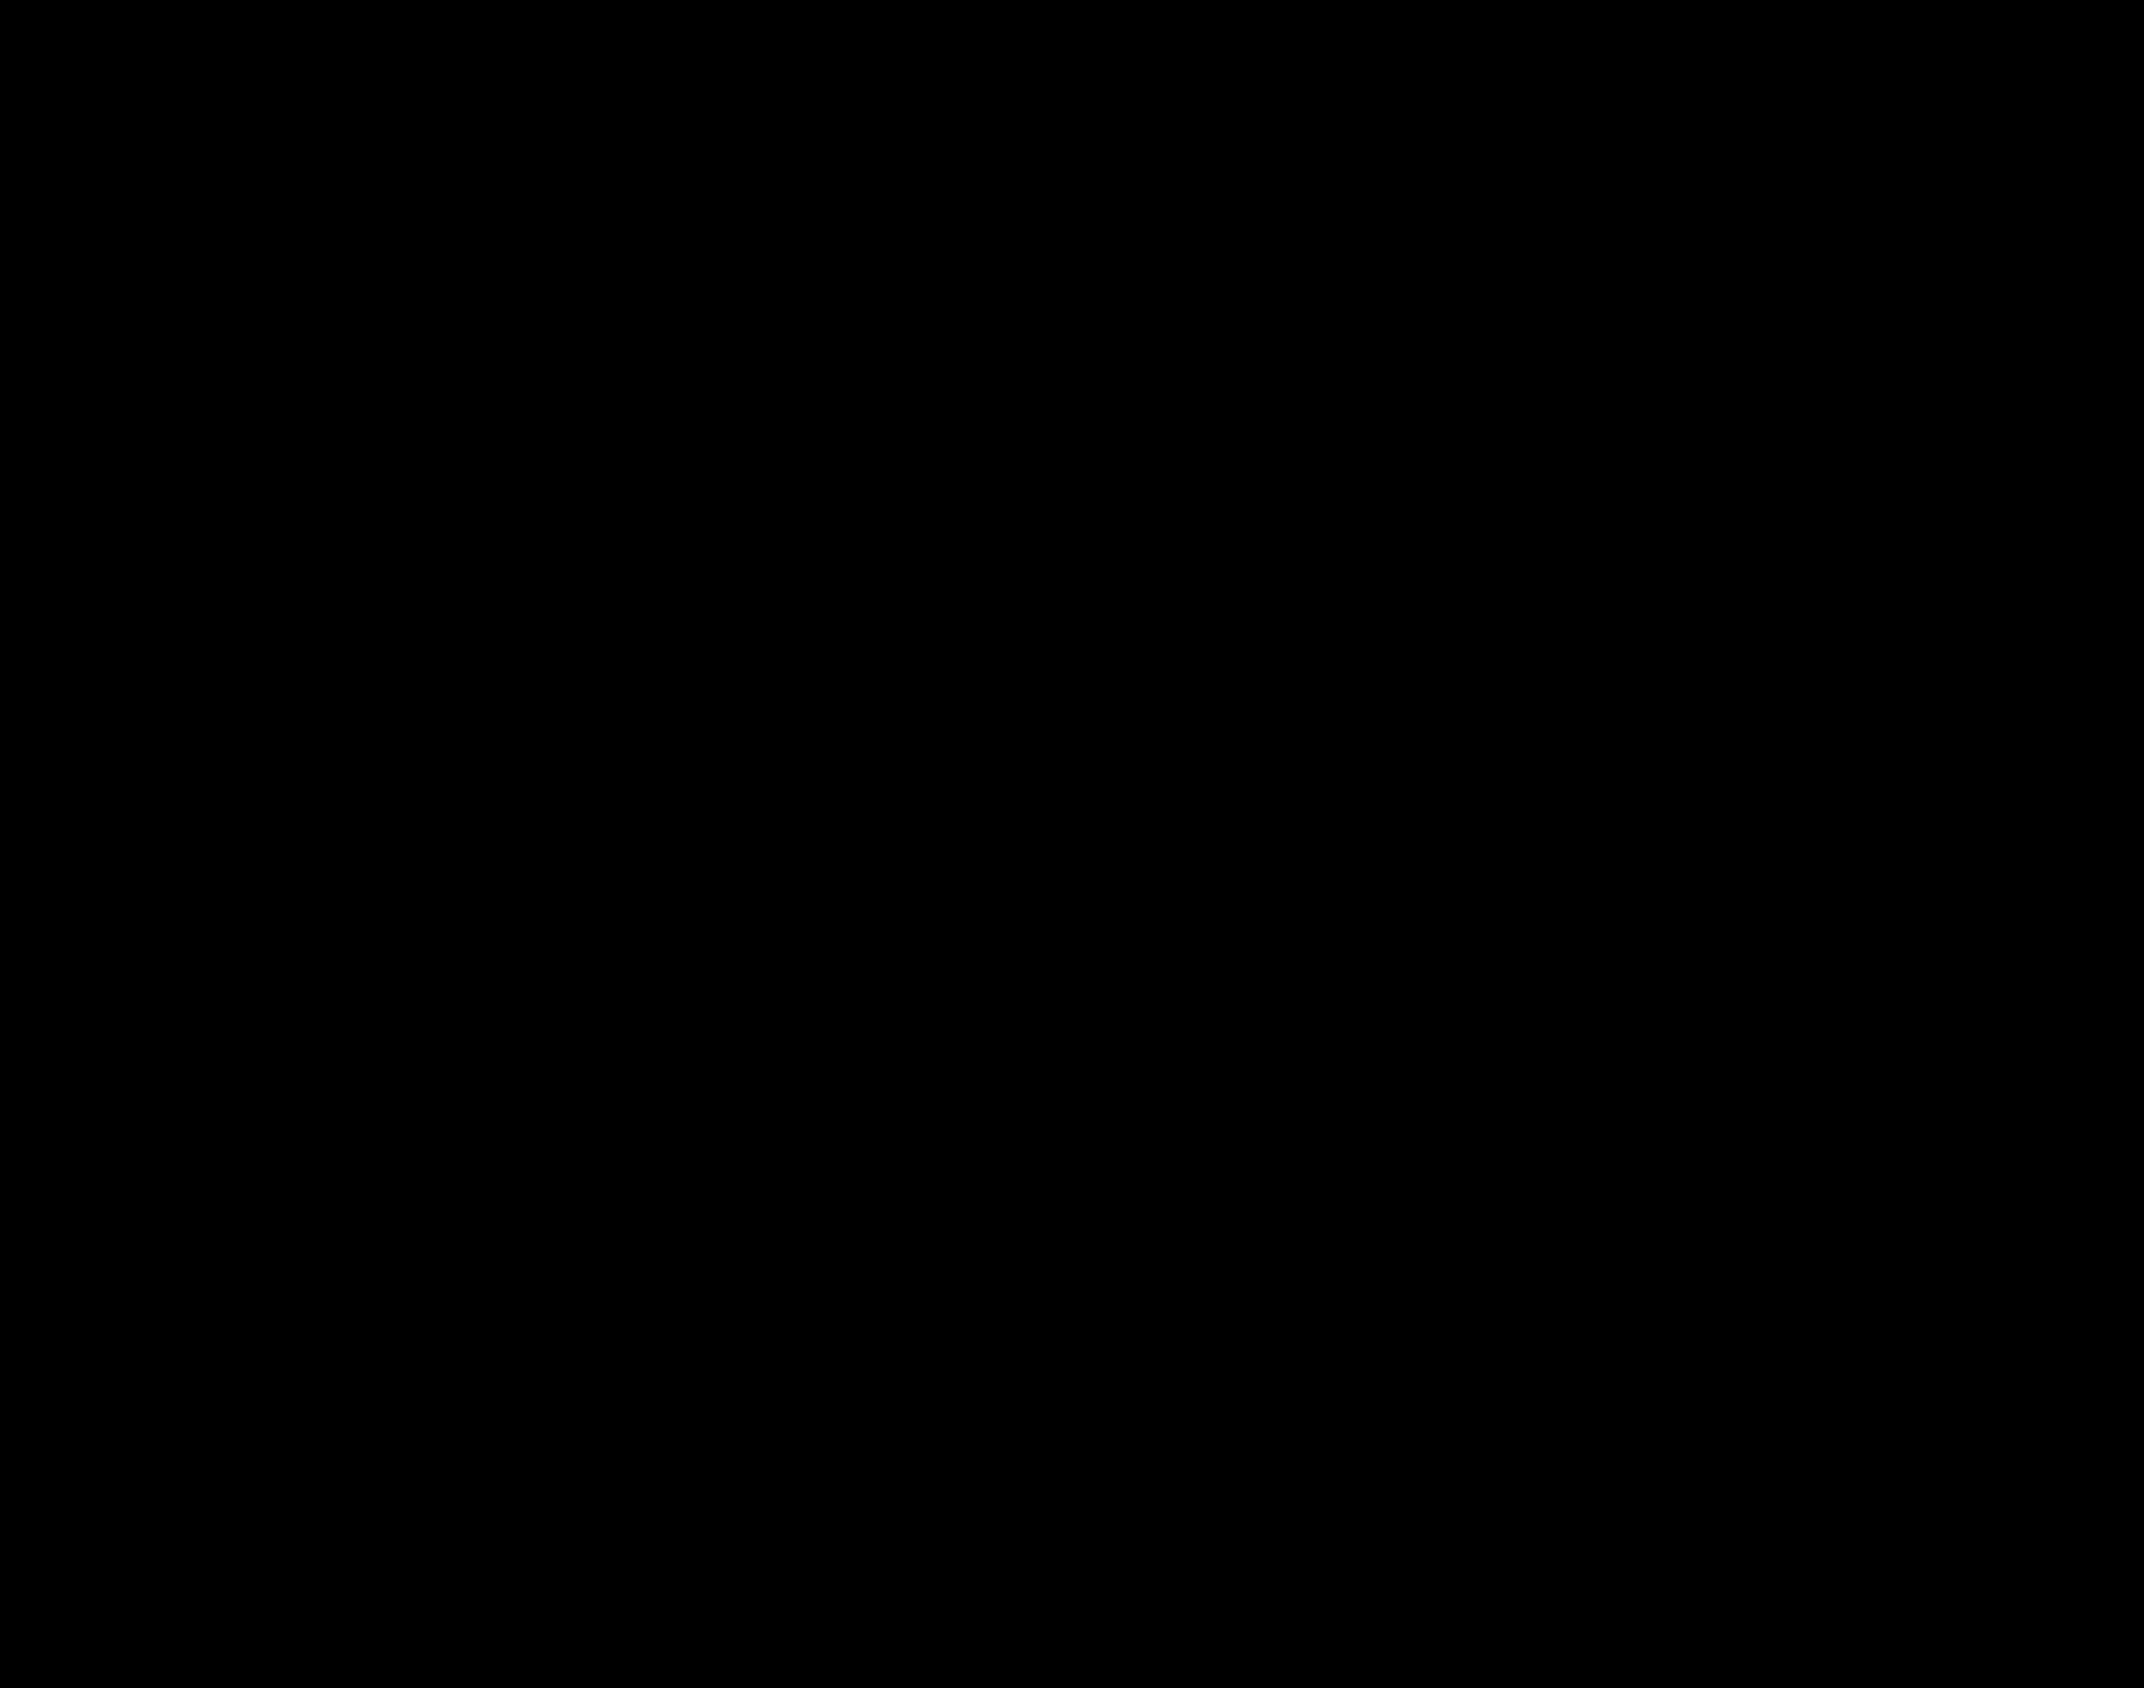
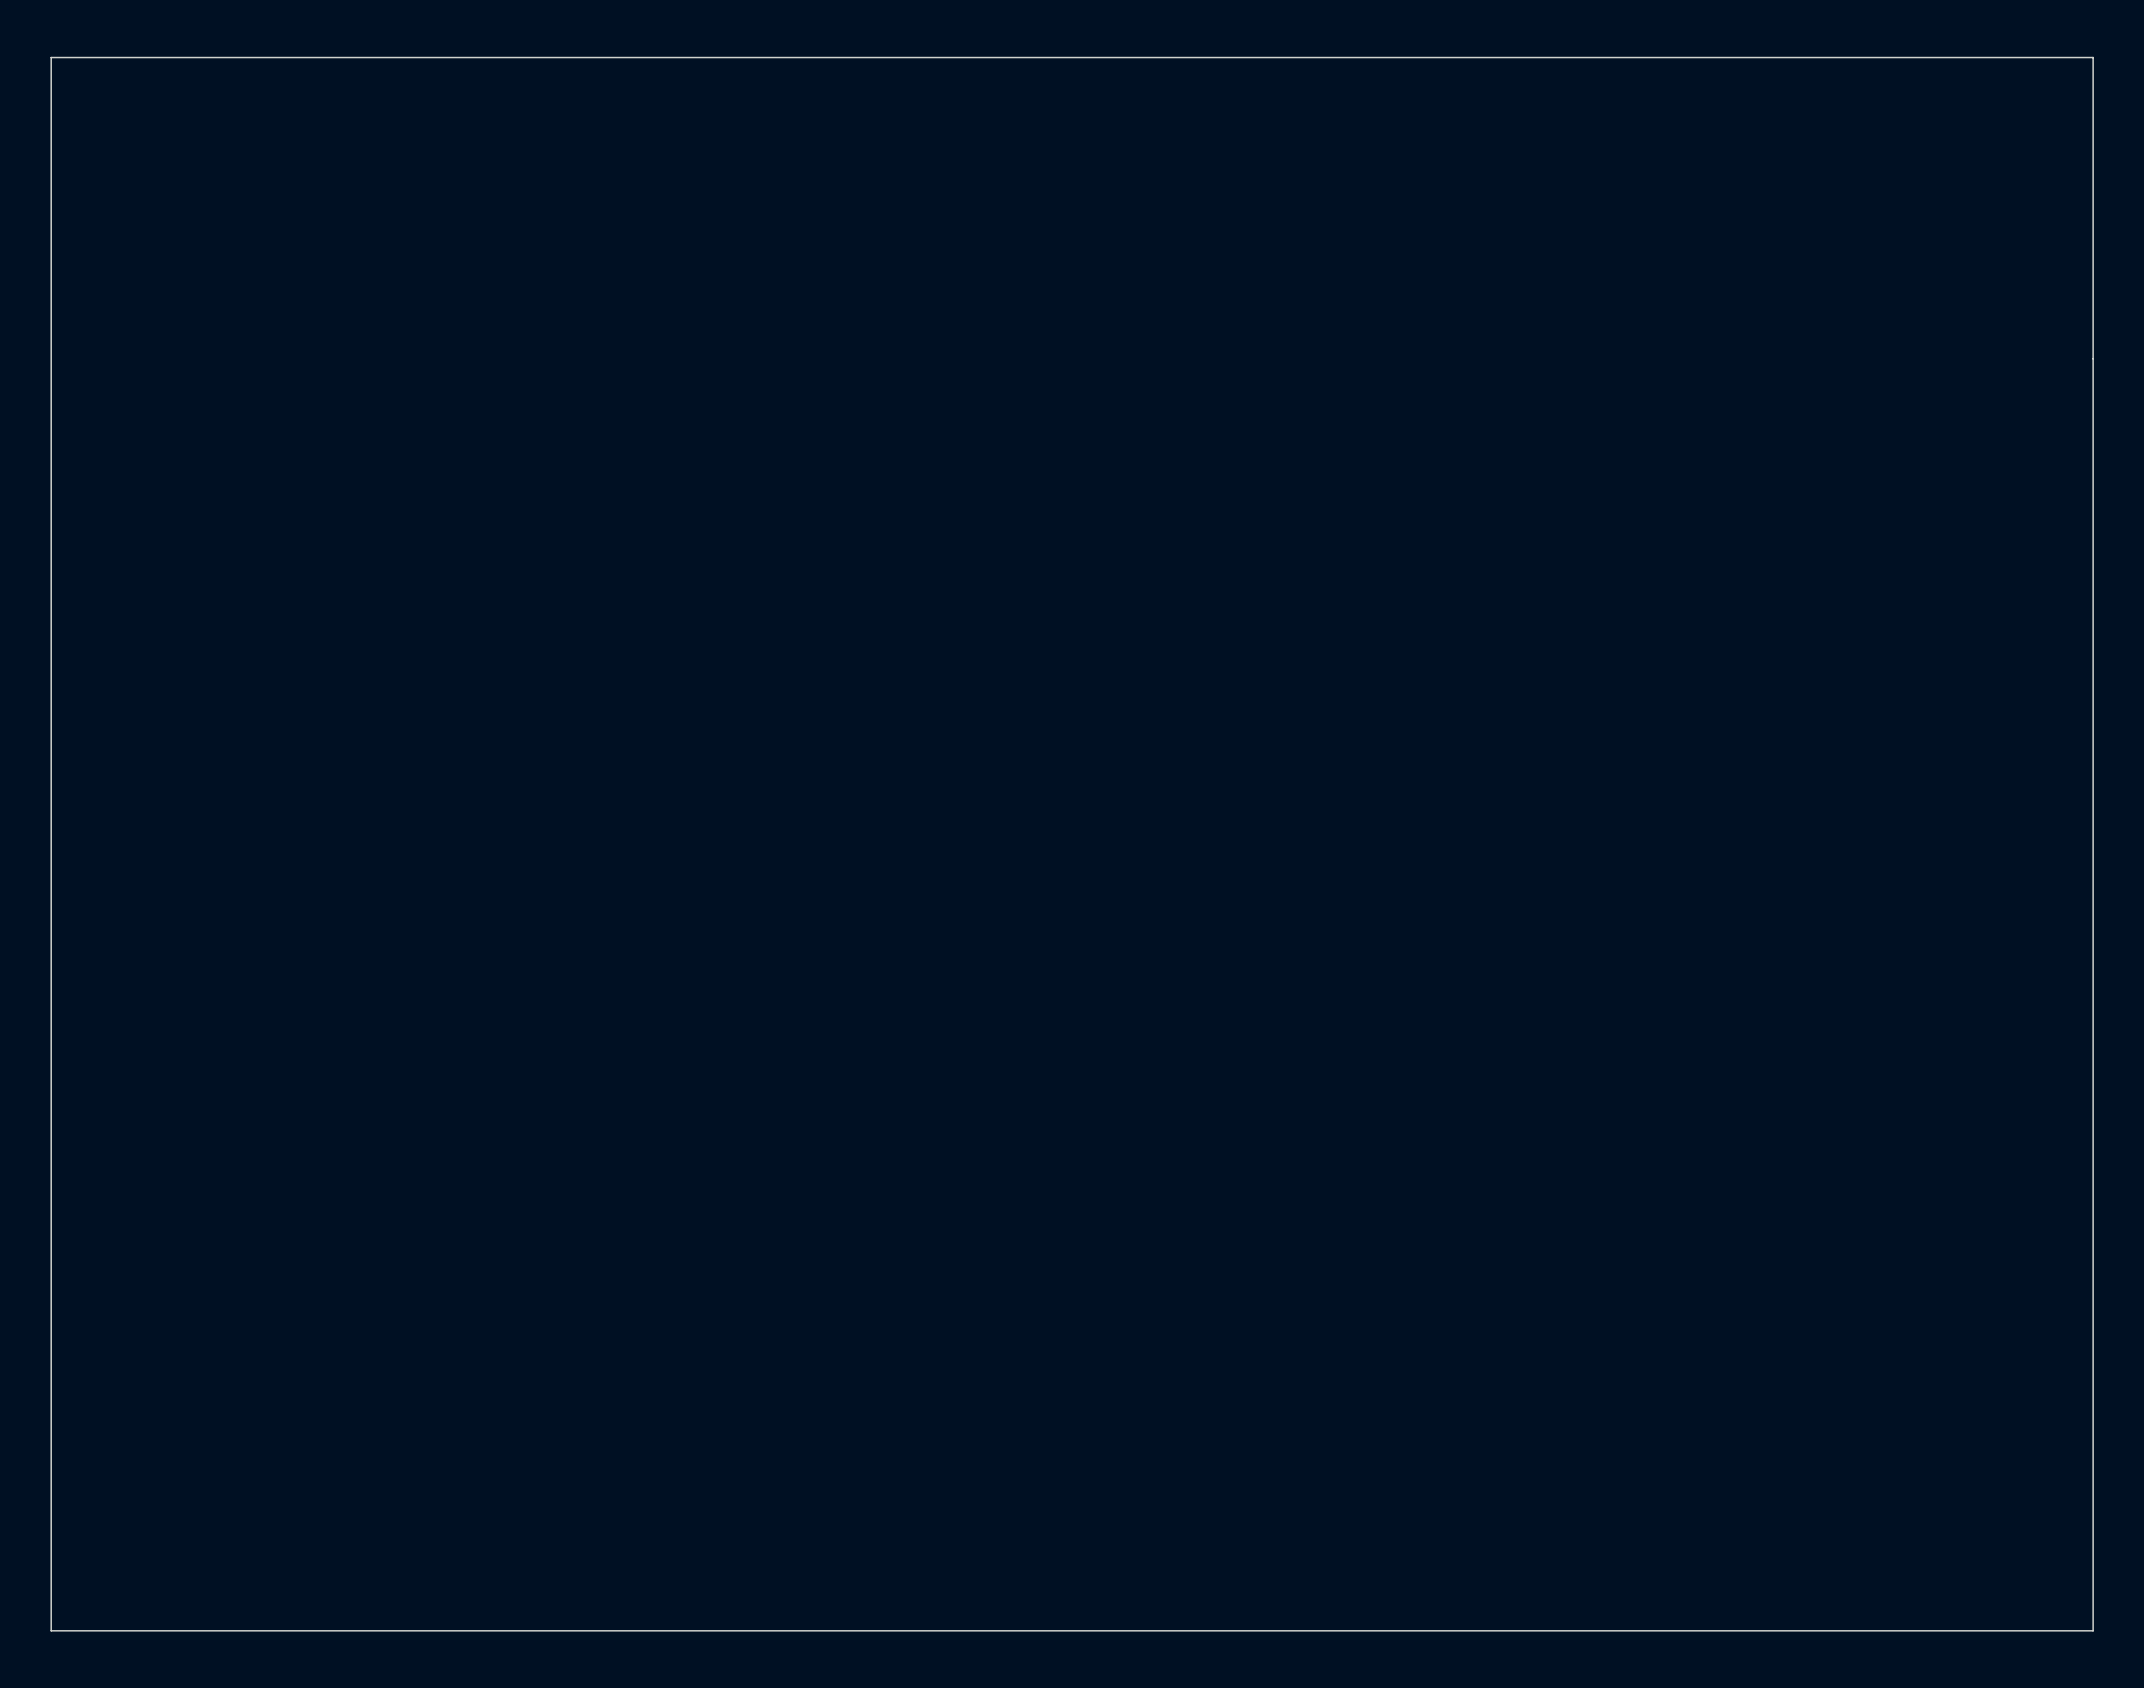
board edge: none -> (2093, 57) (2093, 1630) (51, 1630) (51, 57) (2093, 57)

